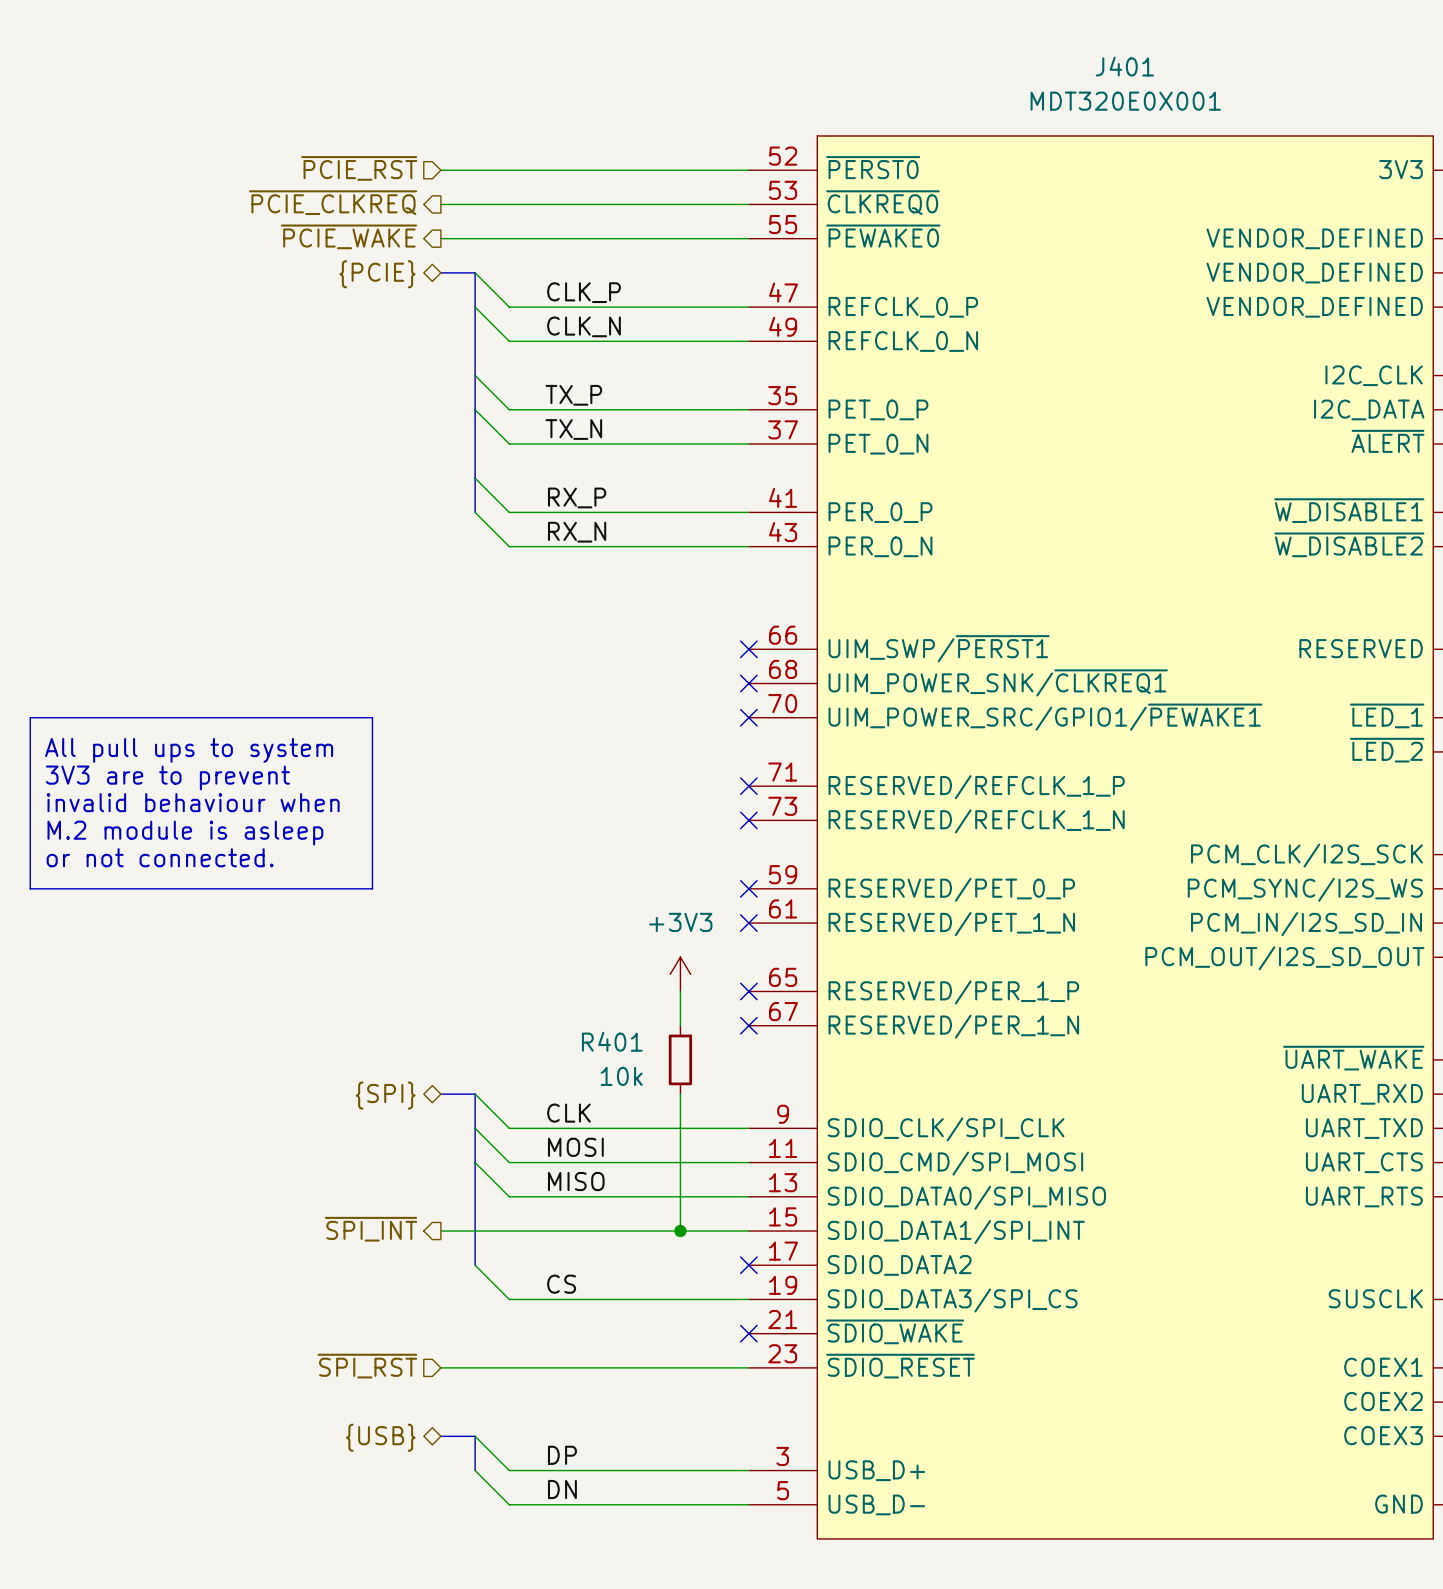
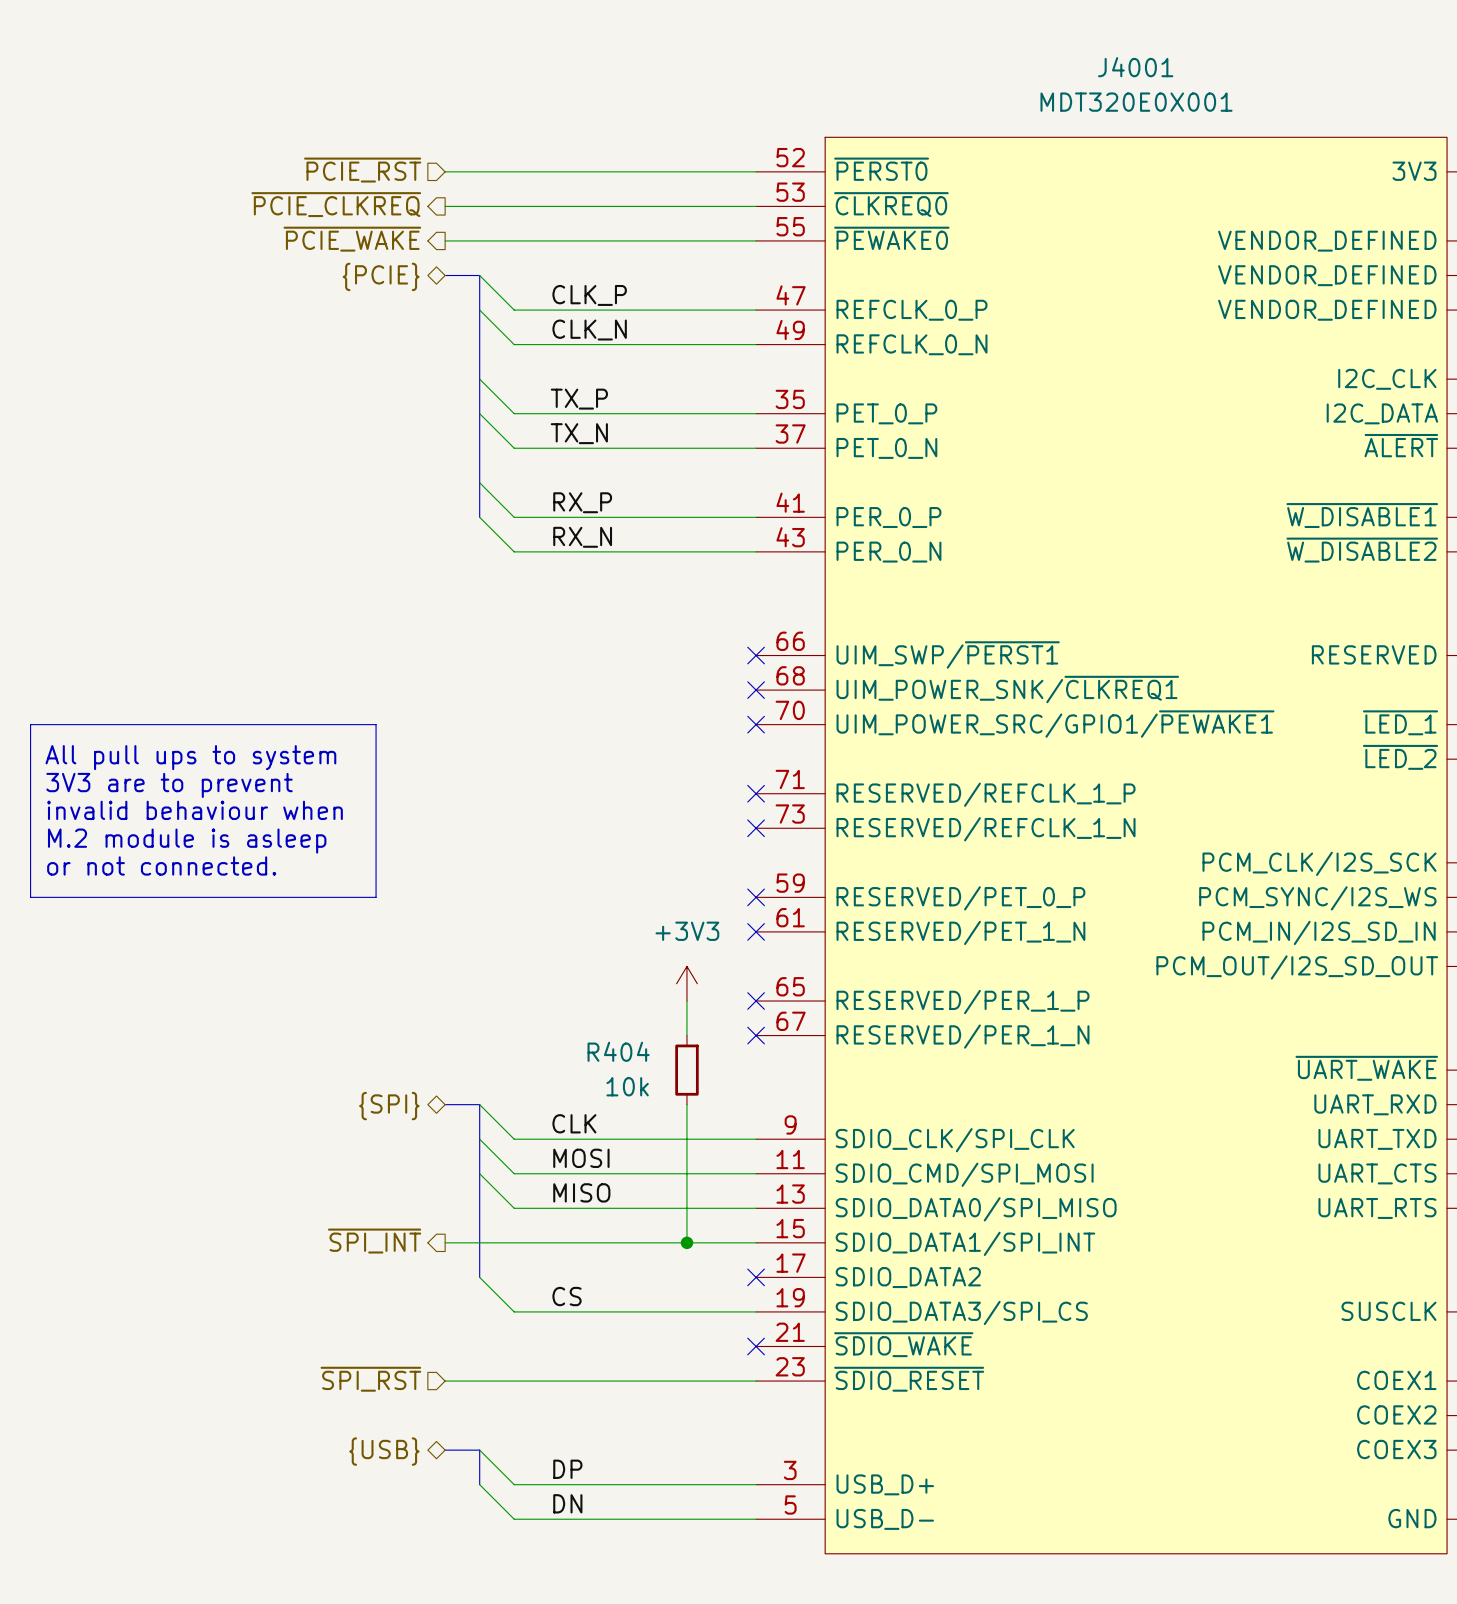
J401 name: J401 (1124, 66) -> J4001 (1135, 67)
R401 name: R401 (612, 1041) -> R404 (618, 1051)

